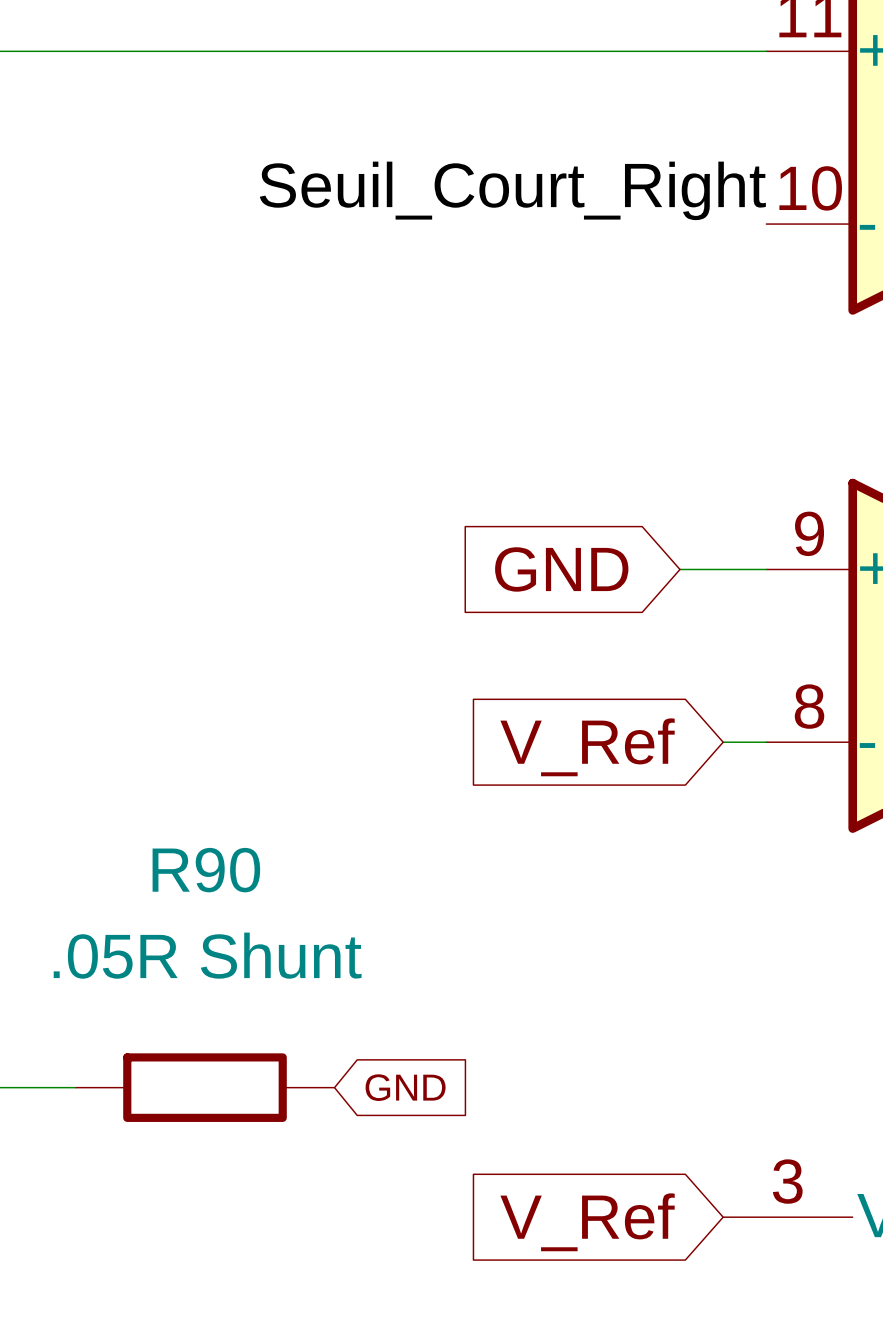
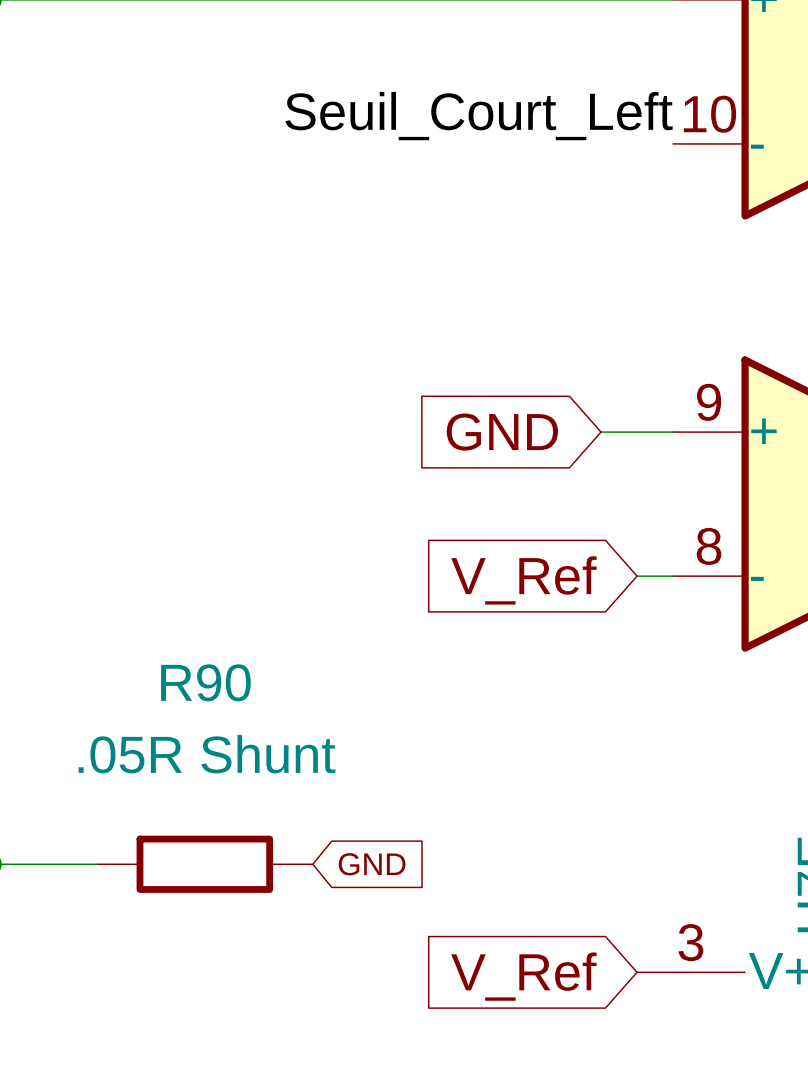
label: Seuil_Court_Right (512, 190) -> Seuil_Court_Left (479, 116)

